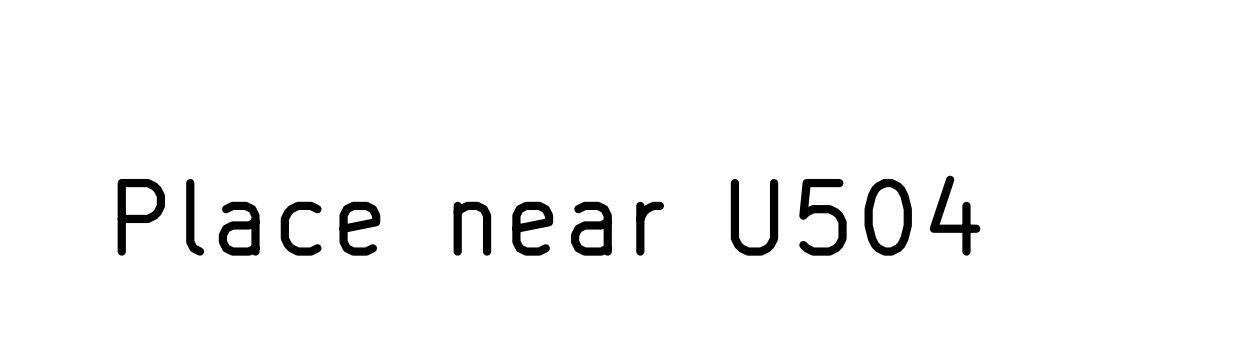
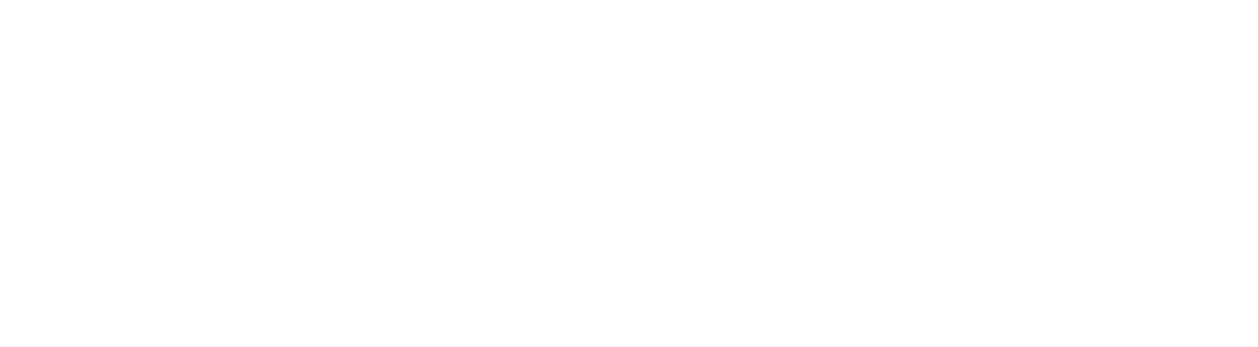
text: Place near U504 (549, 215) -> none

